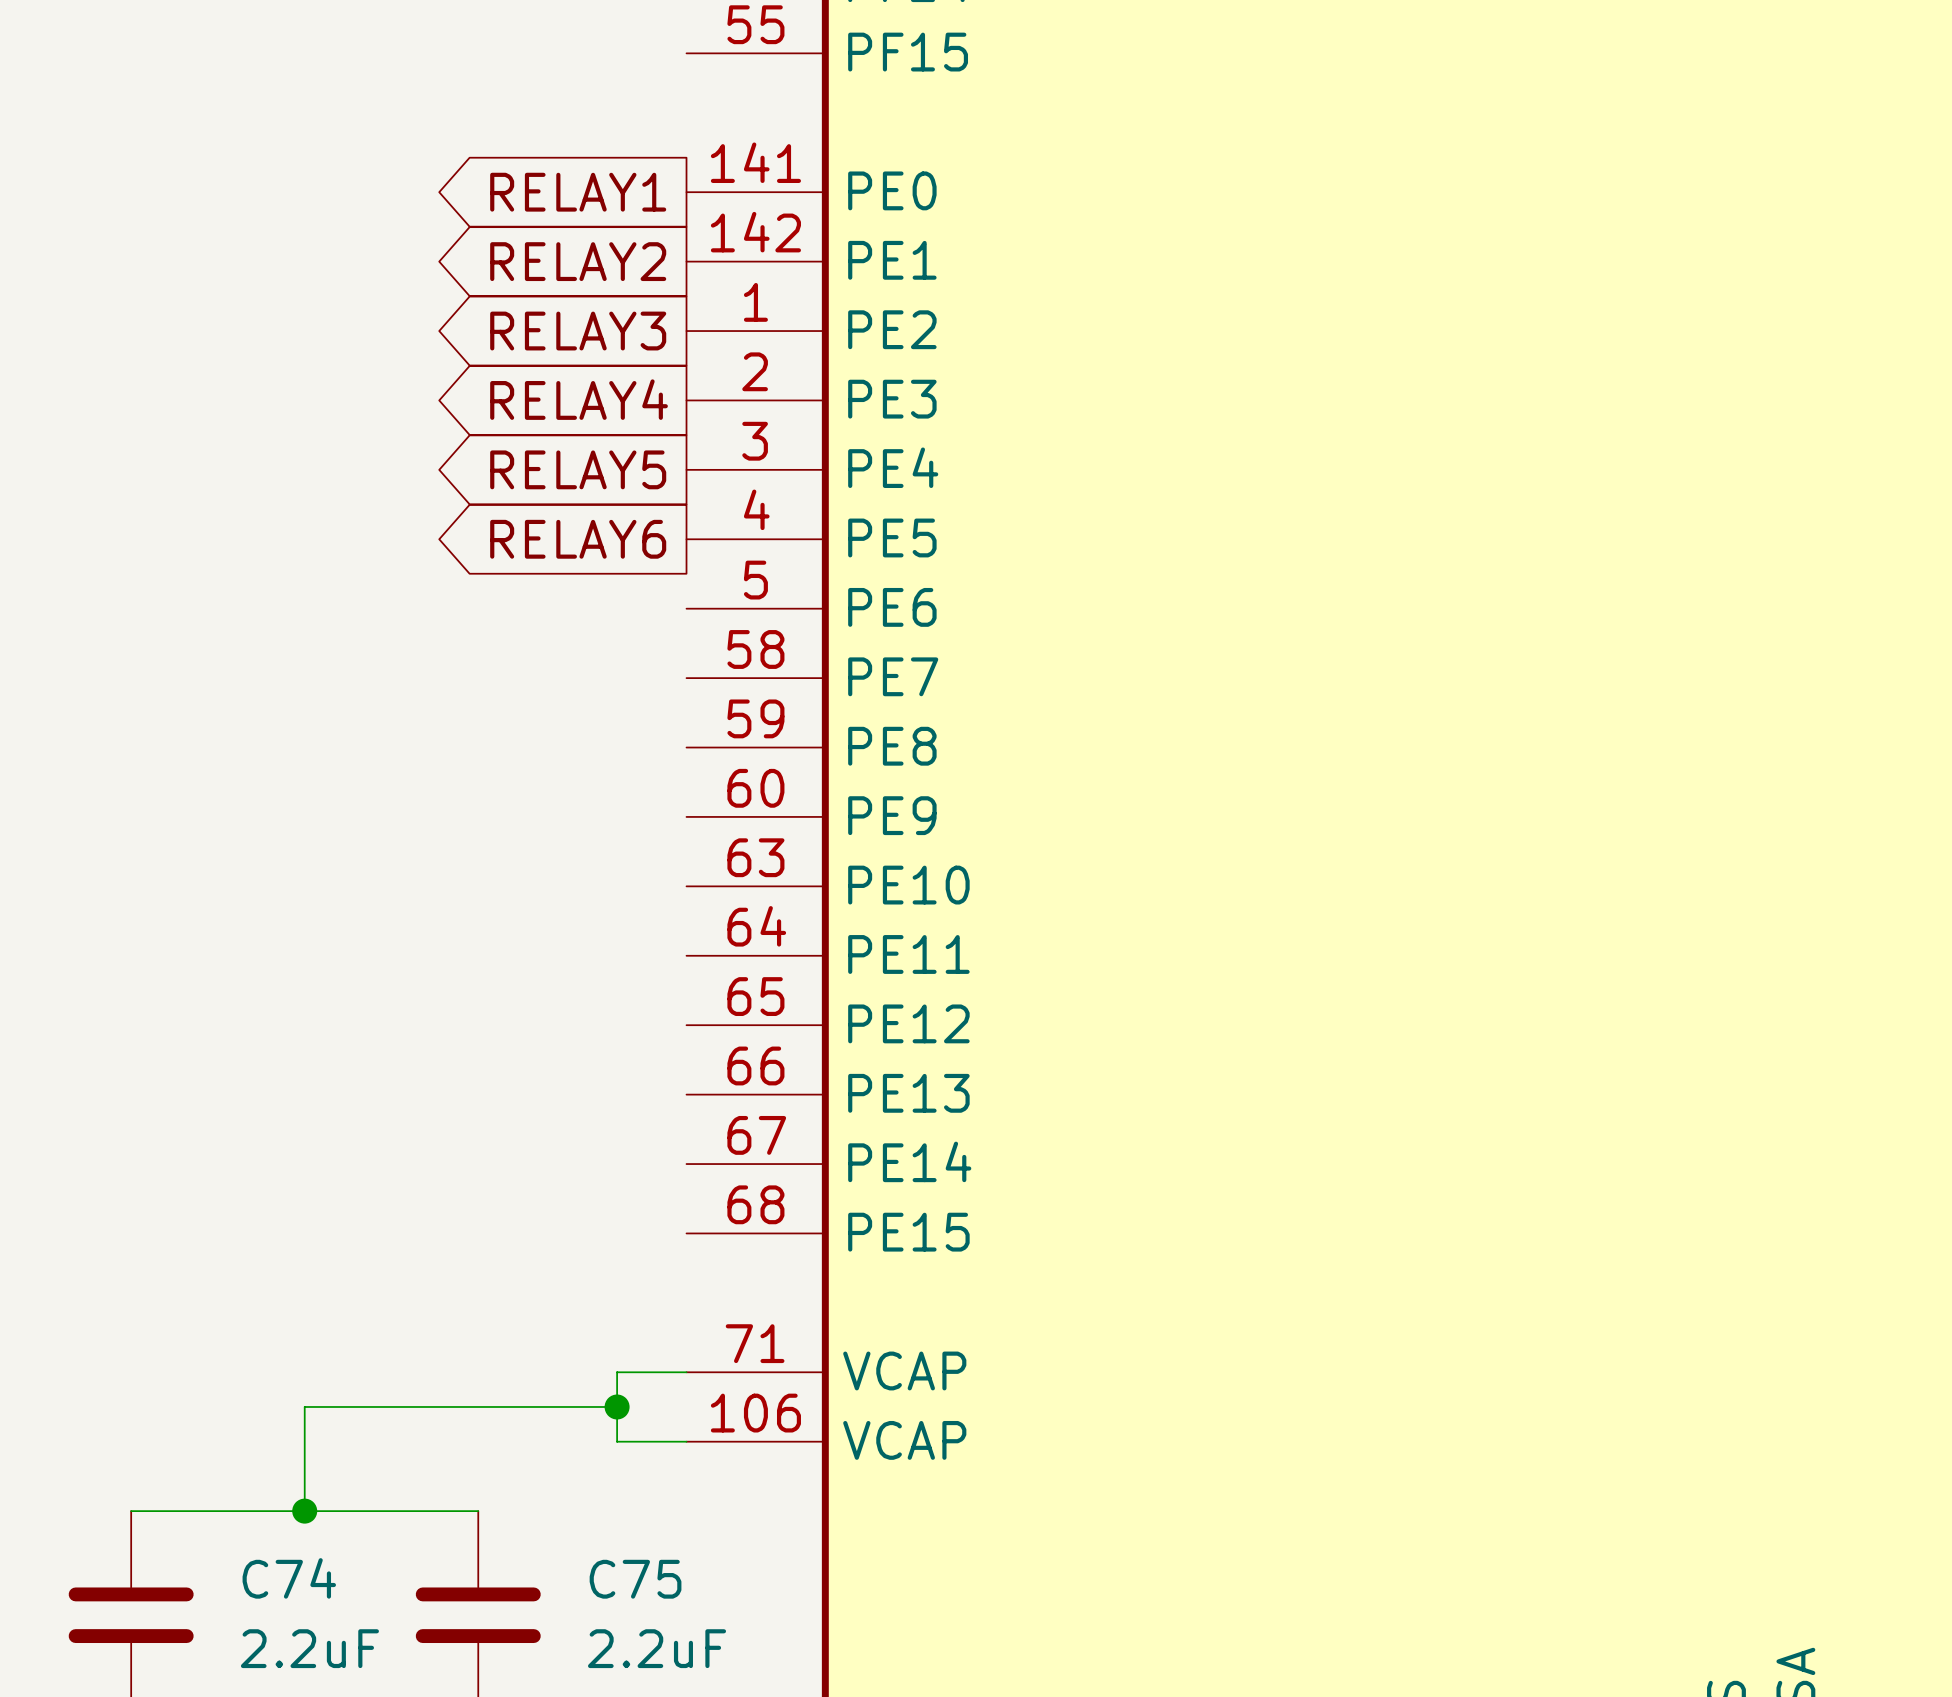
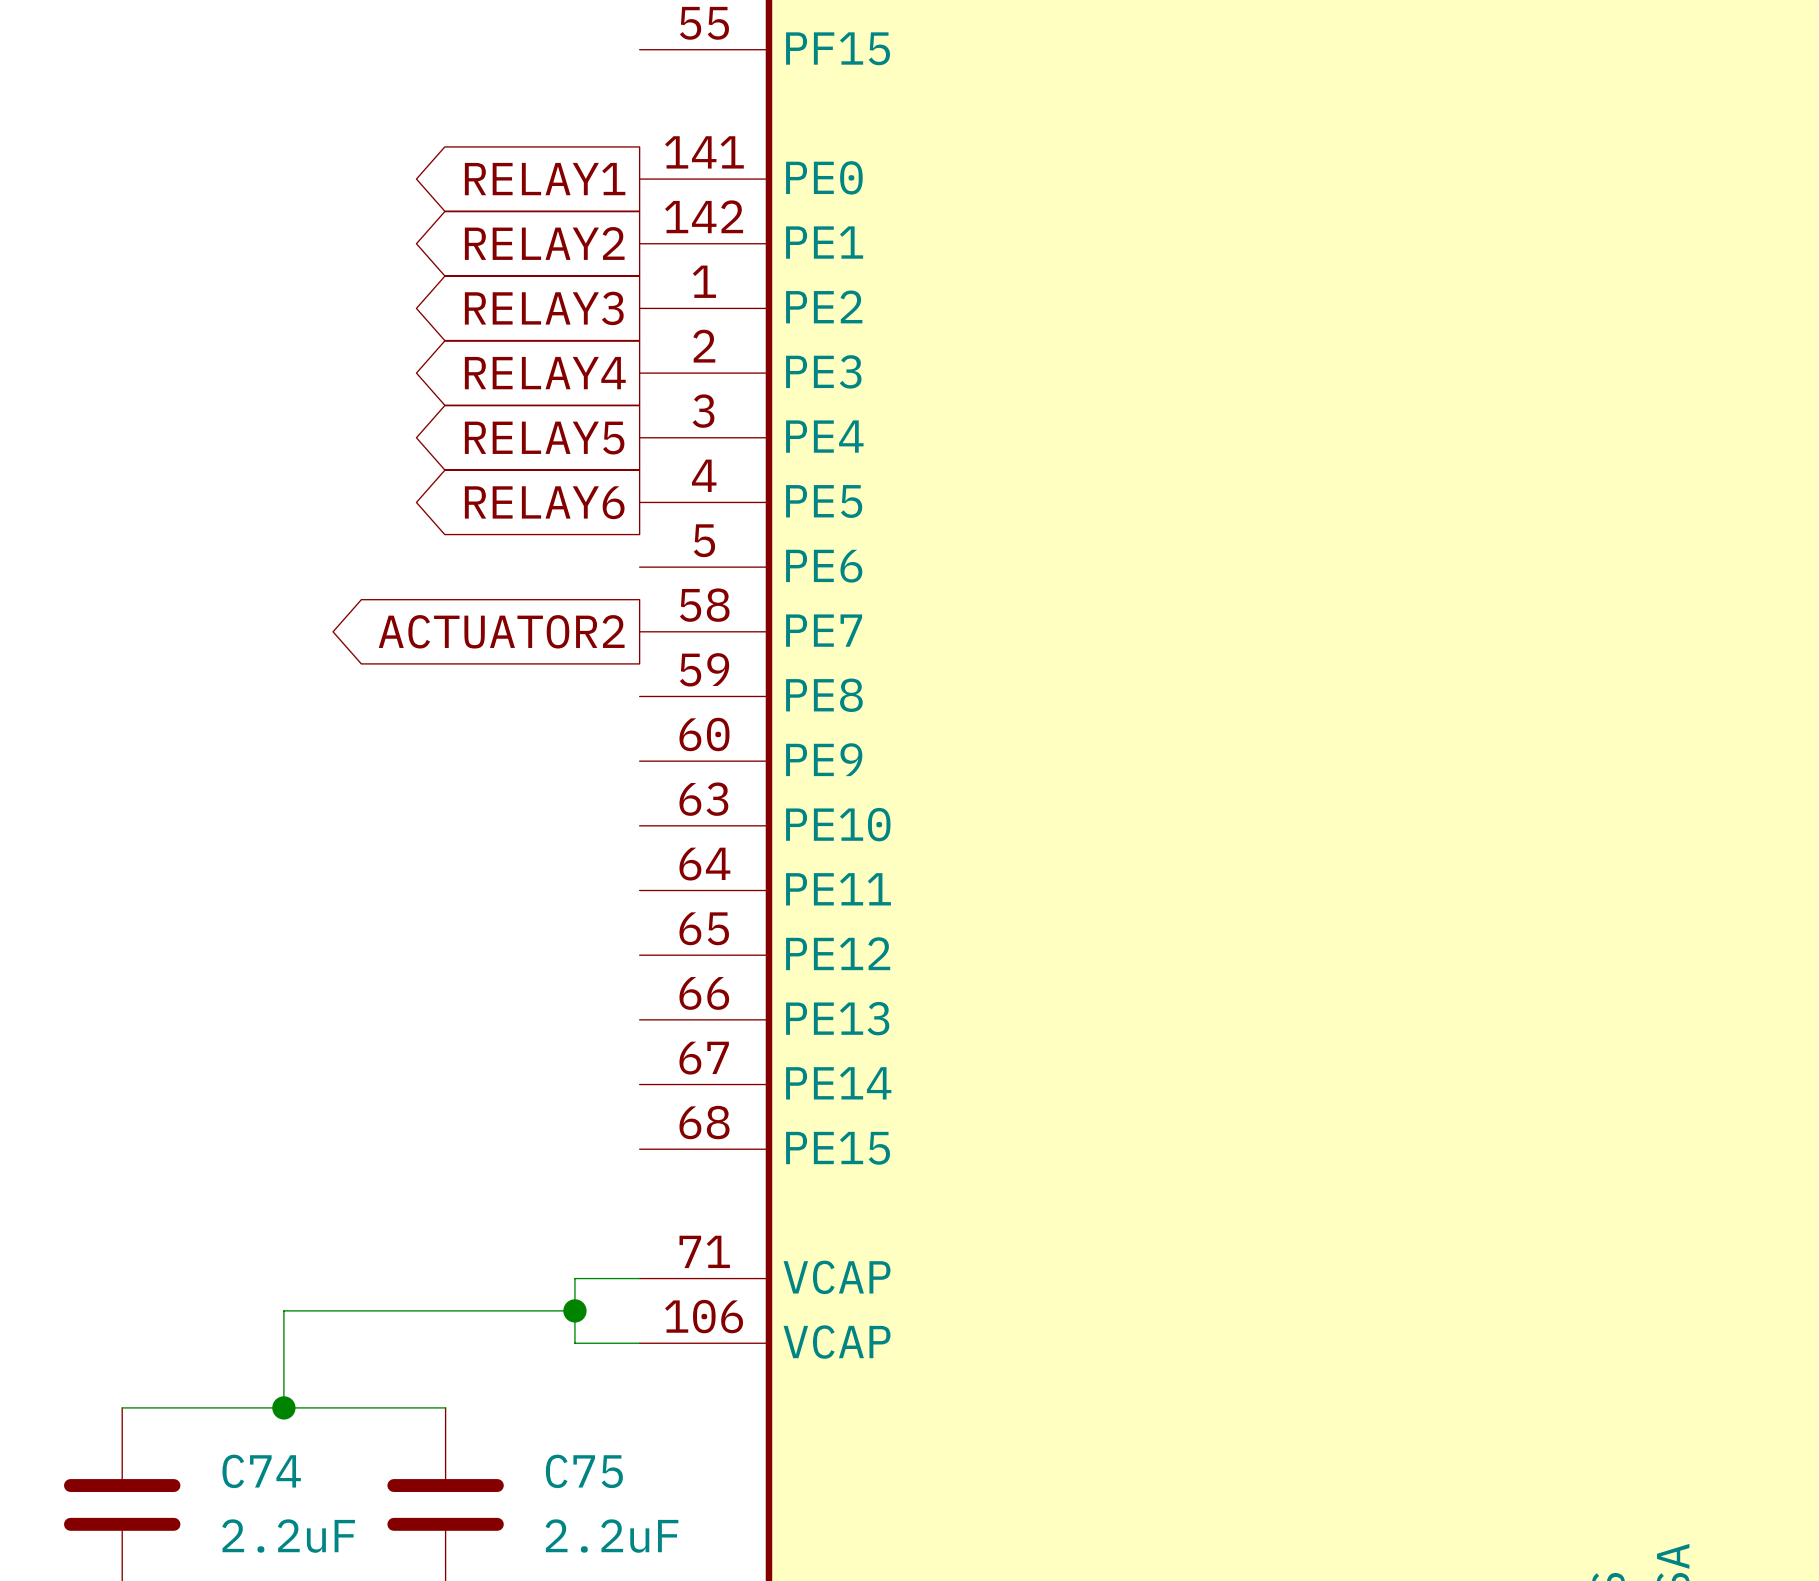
global label: none -> ACTUATOR2 (501, 631)

